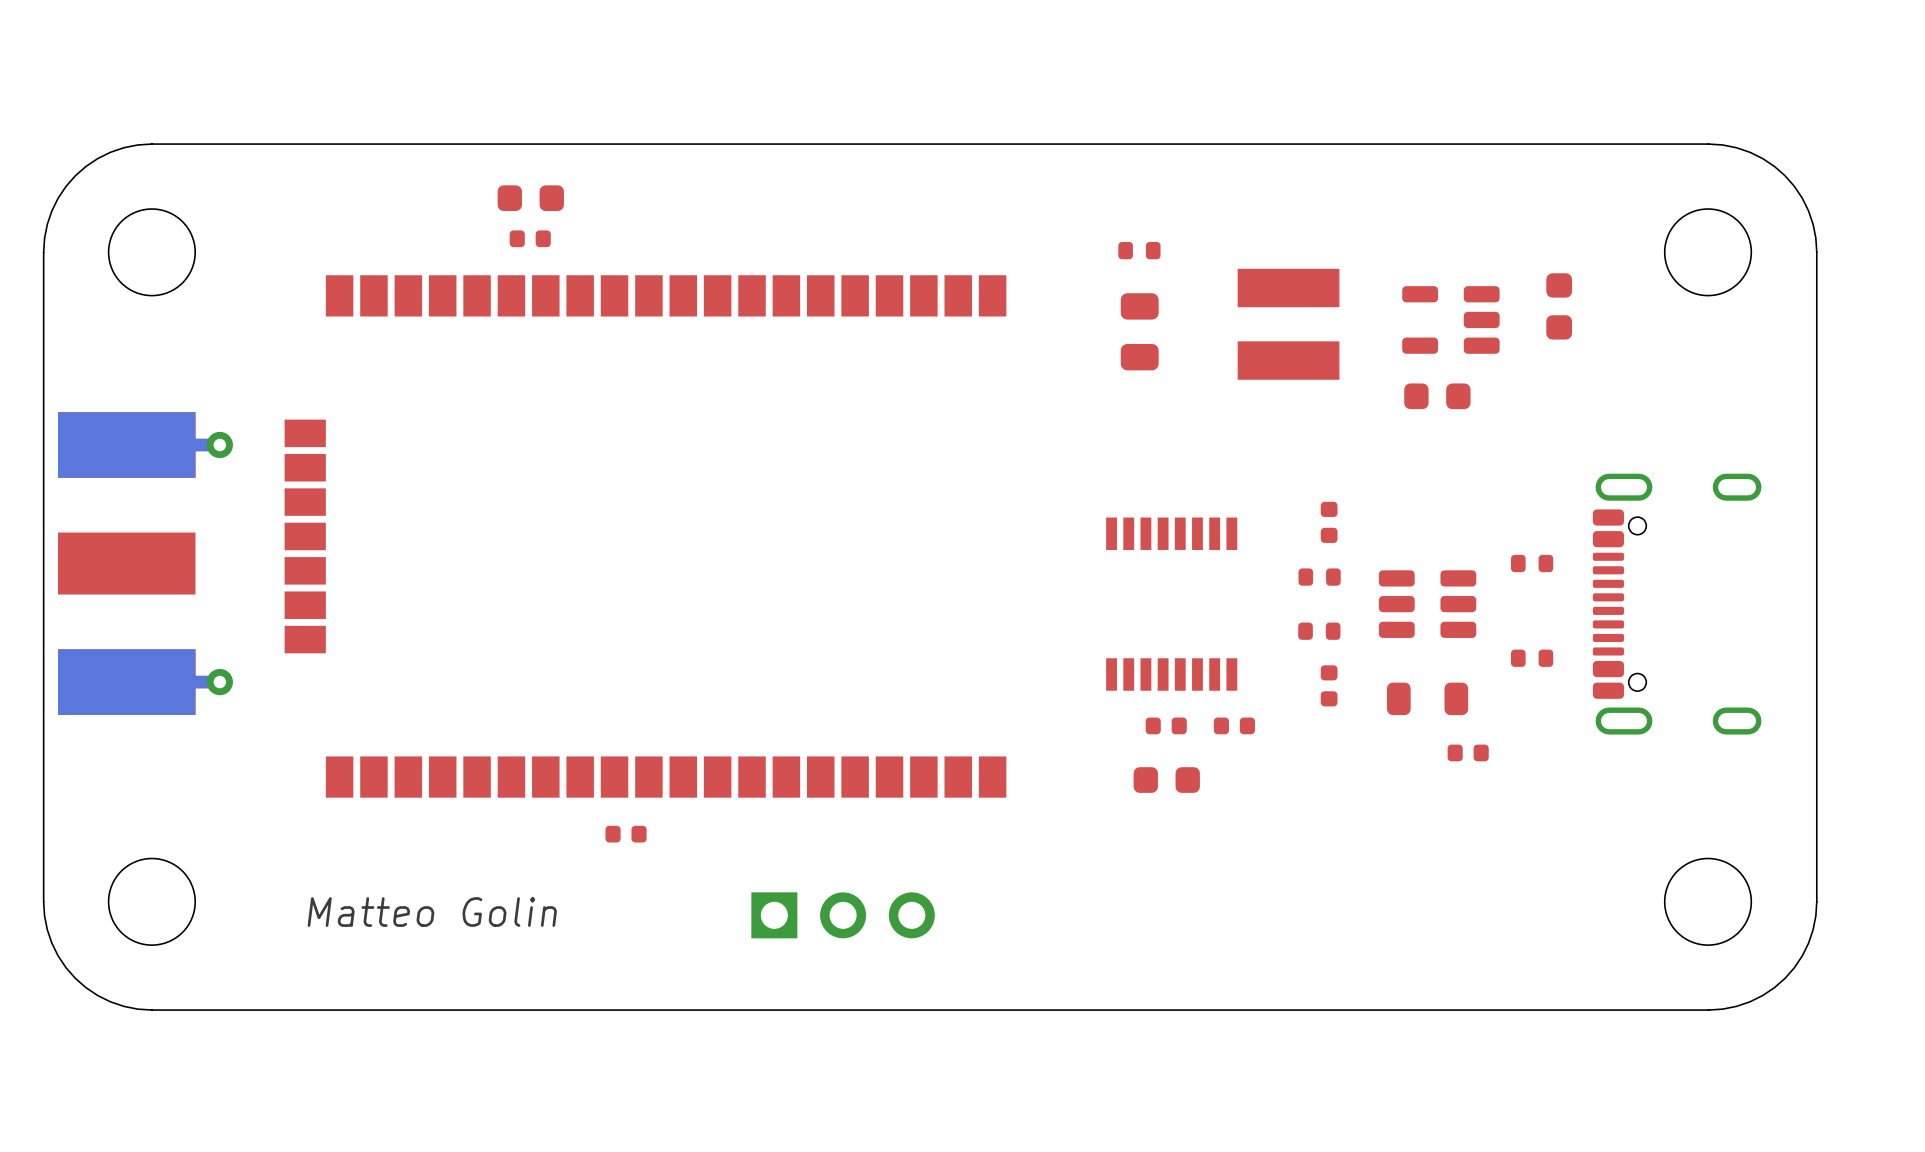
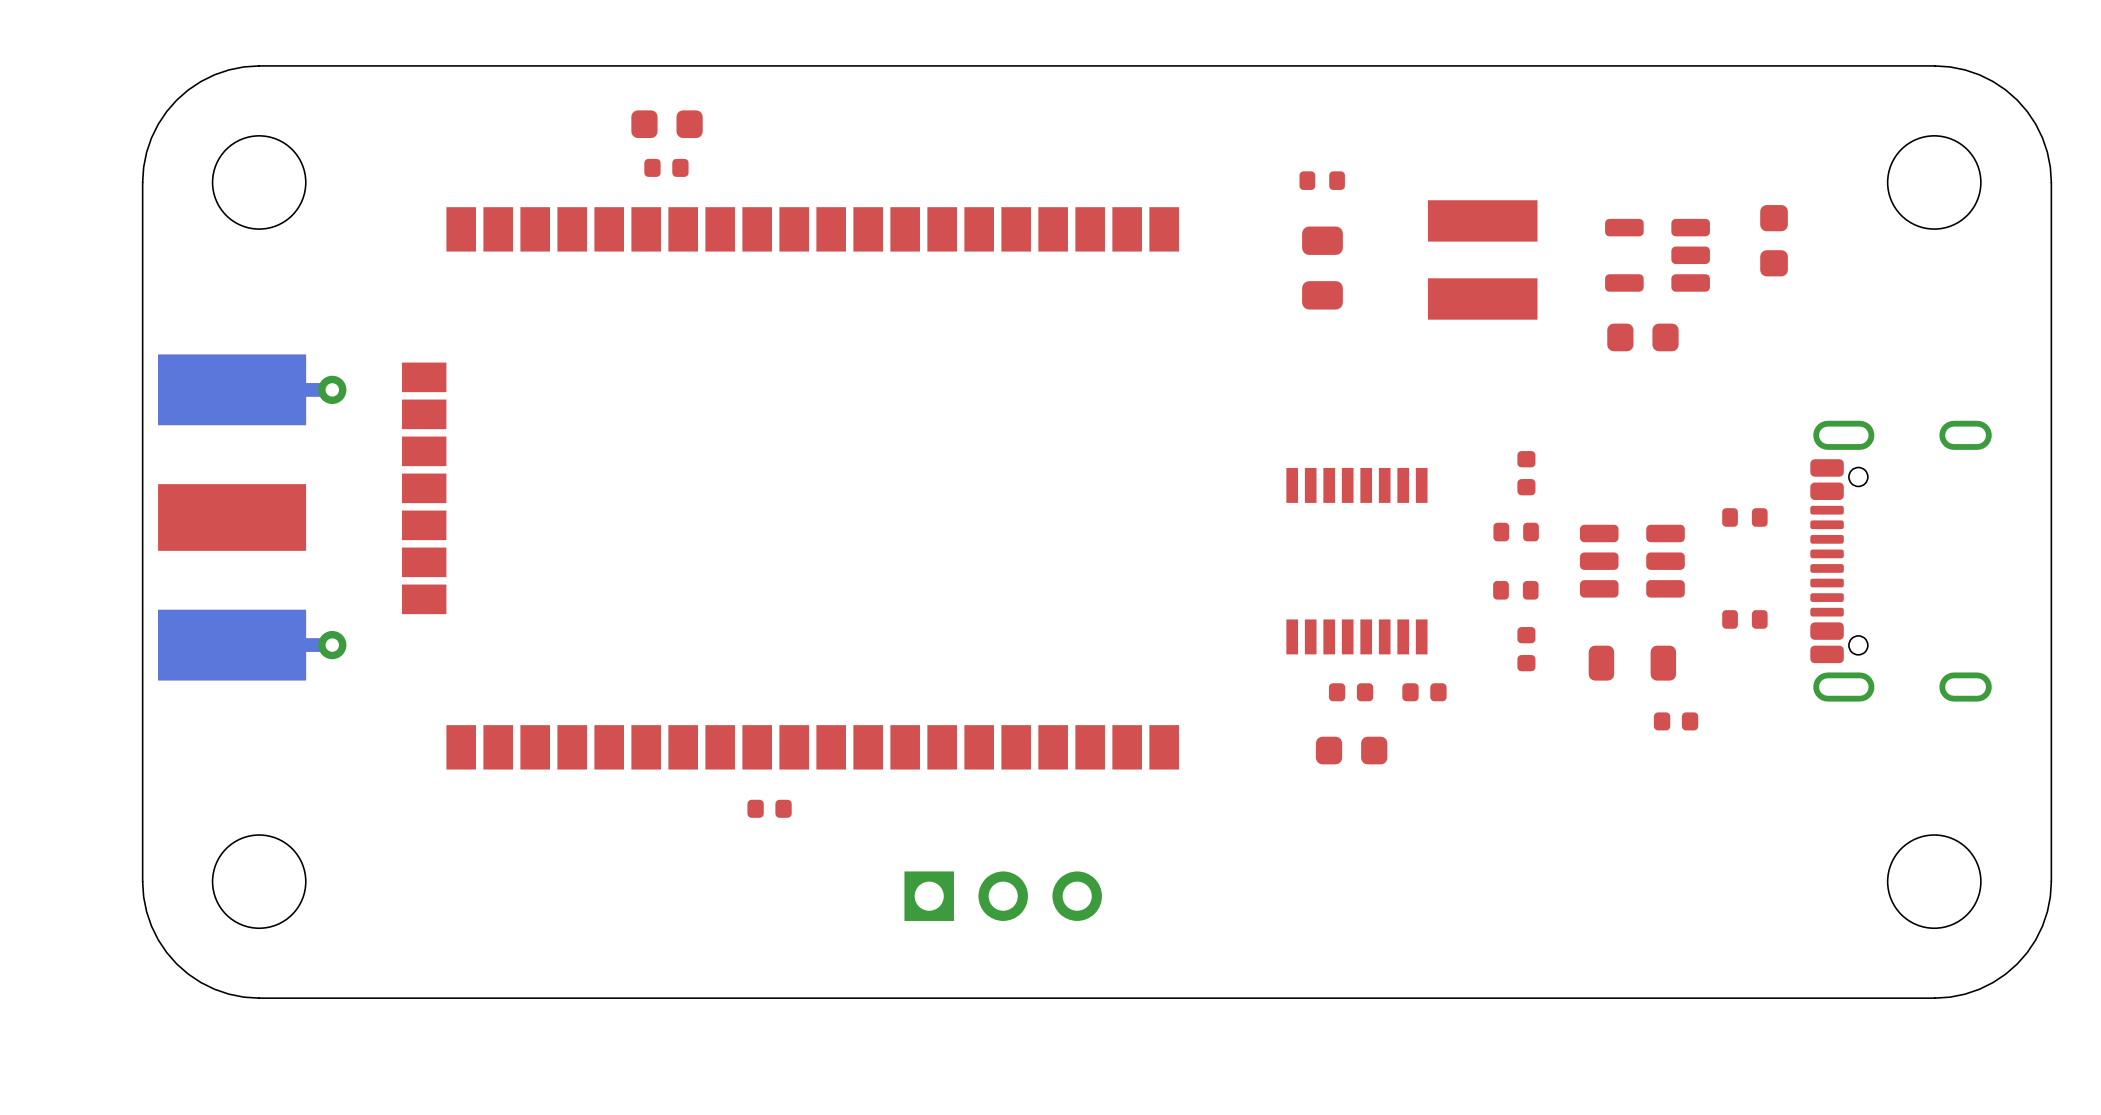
text: Matteo Golin (432, 912) -> none

